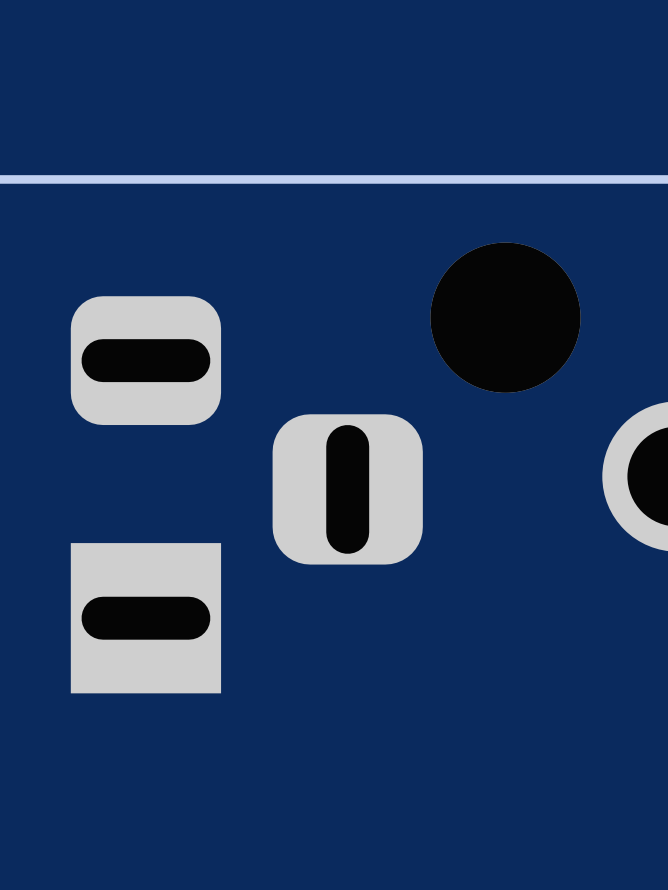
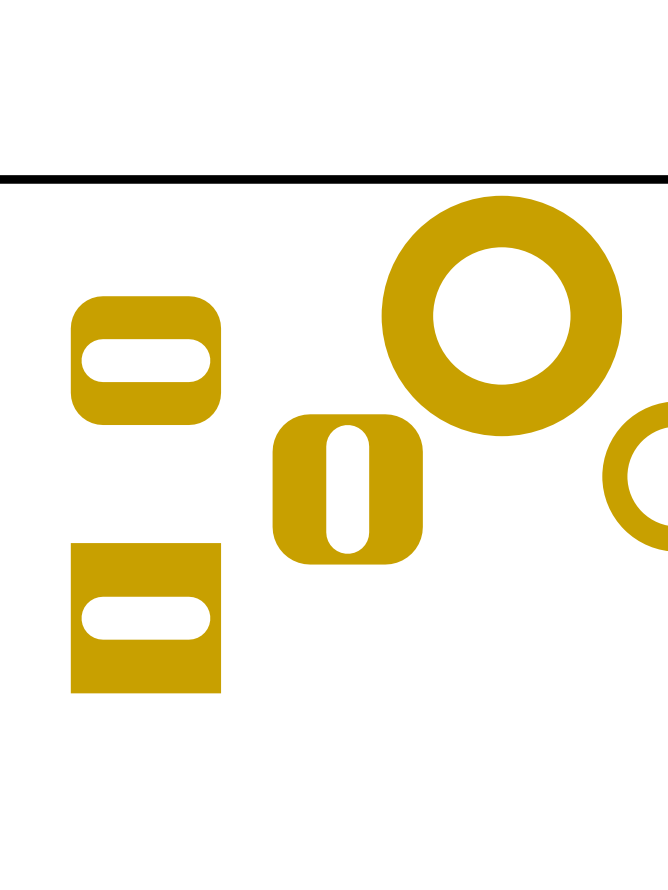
part footprint: [430, 242, 581, 393] -> [381, 195, 623, 437]

